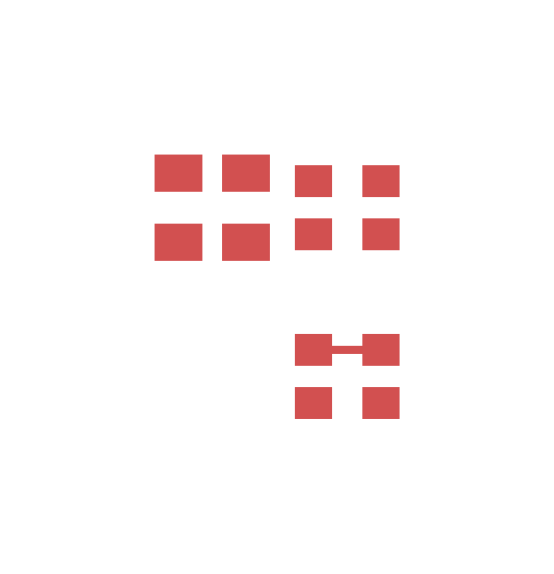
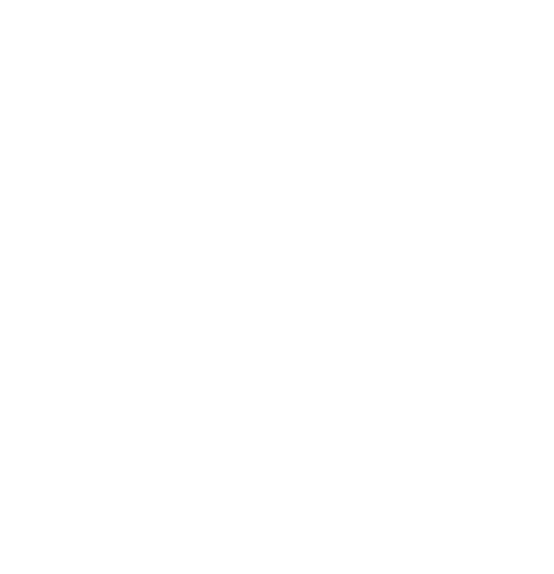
part: (178, 207) -> none
part: (245, 207) -> none
part: (313, 207) -> none
part: (380, 207) -> none
top track: (380, 349) (313, 349) -> none
part: (313, 376) -> none
part: (380, 376) -> none

